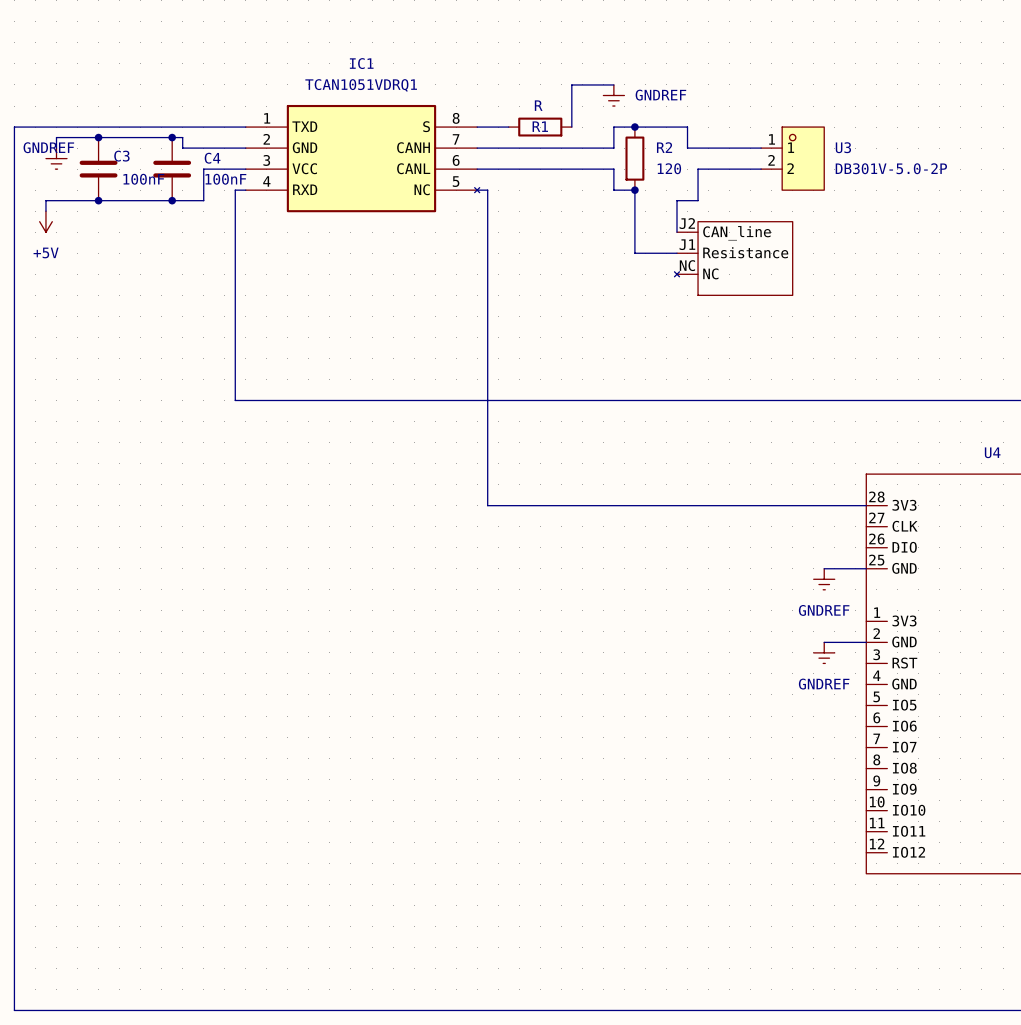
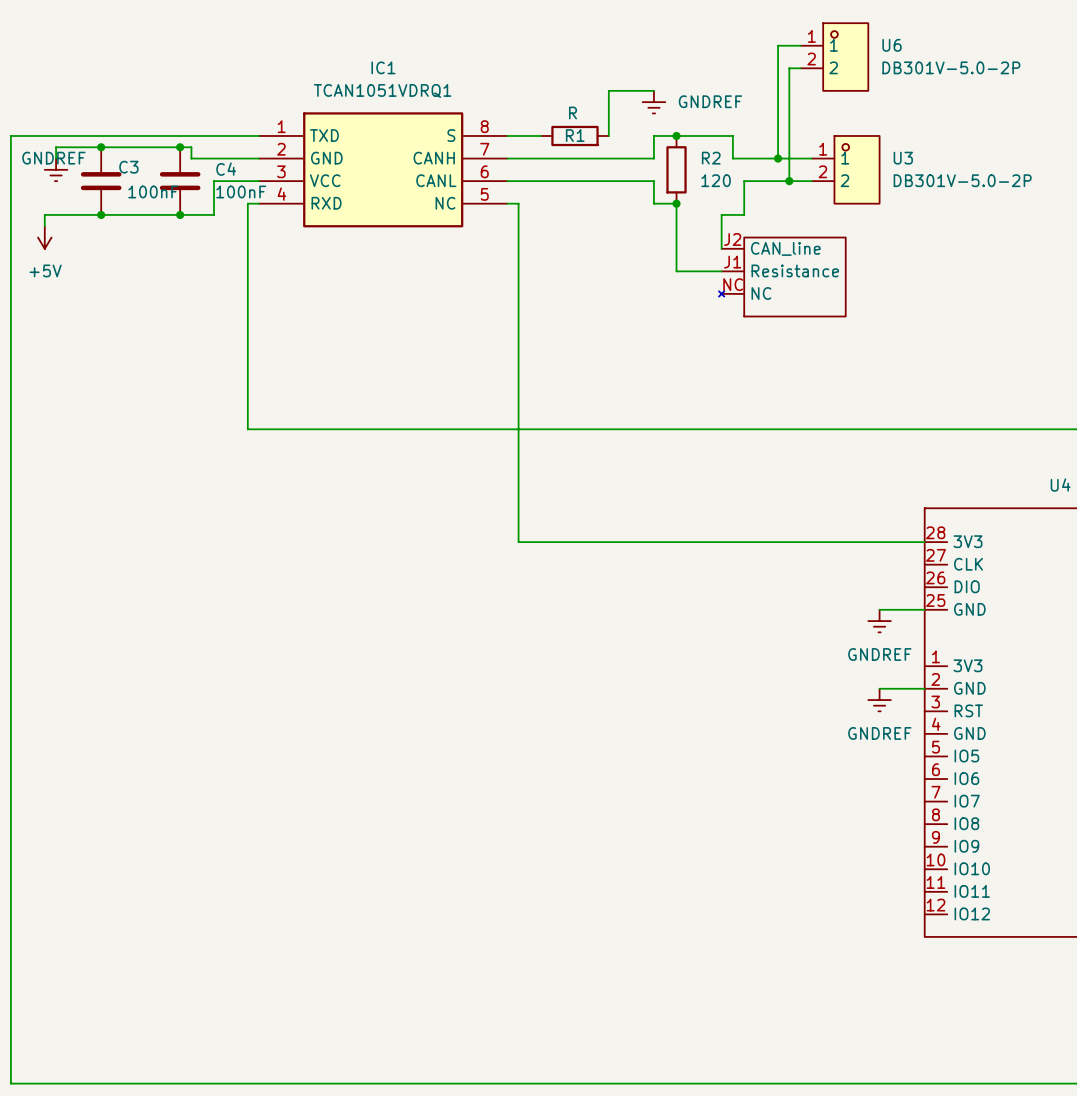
wire: none -> (800, 45) (778, 45) (778, 158)
U6: none -> DB301V-5.0-2P (834, 57)
wire: none -> (800, 68) (789, 68) (789, 181)
IC1 symbol: [245, 104, 480, 213] -> [259, 112, 508, 228]
junction: none -> (778, 158)
junction: none -> (789, 181)

